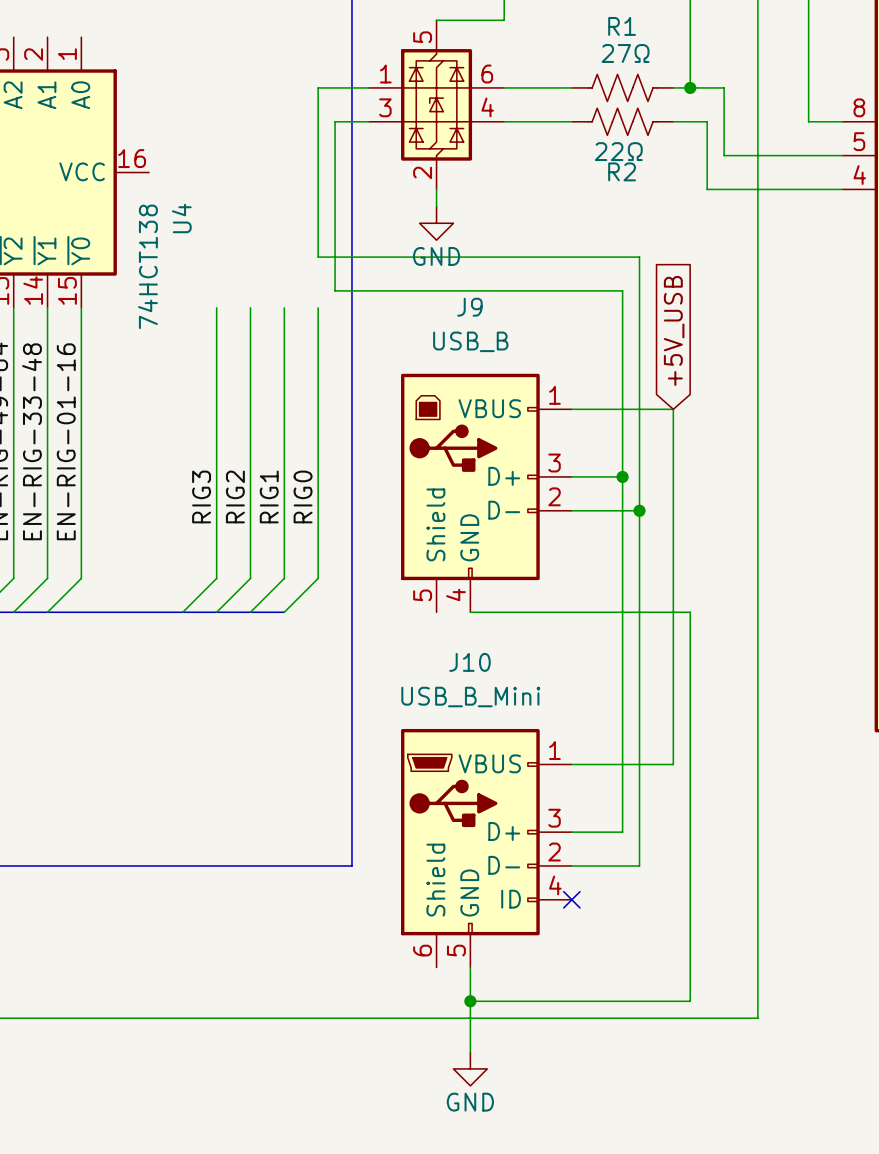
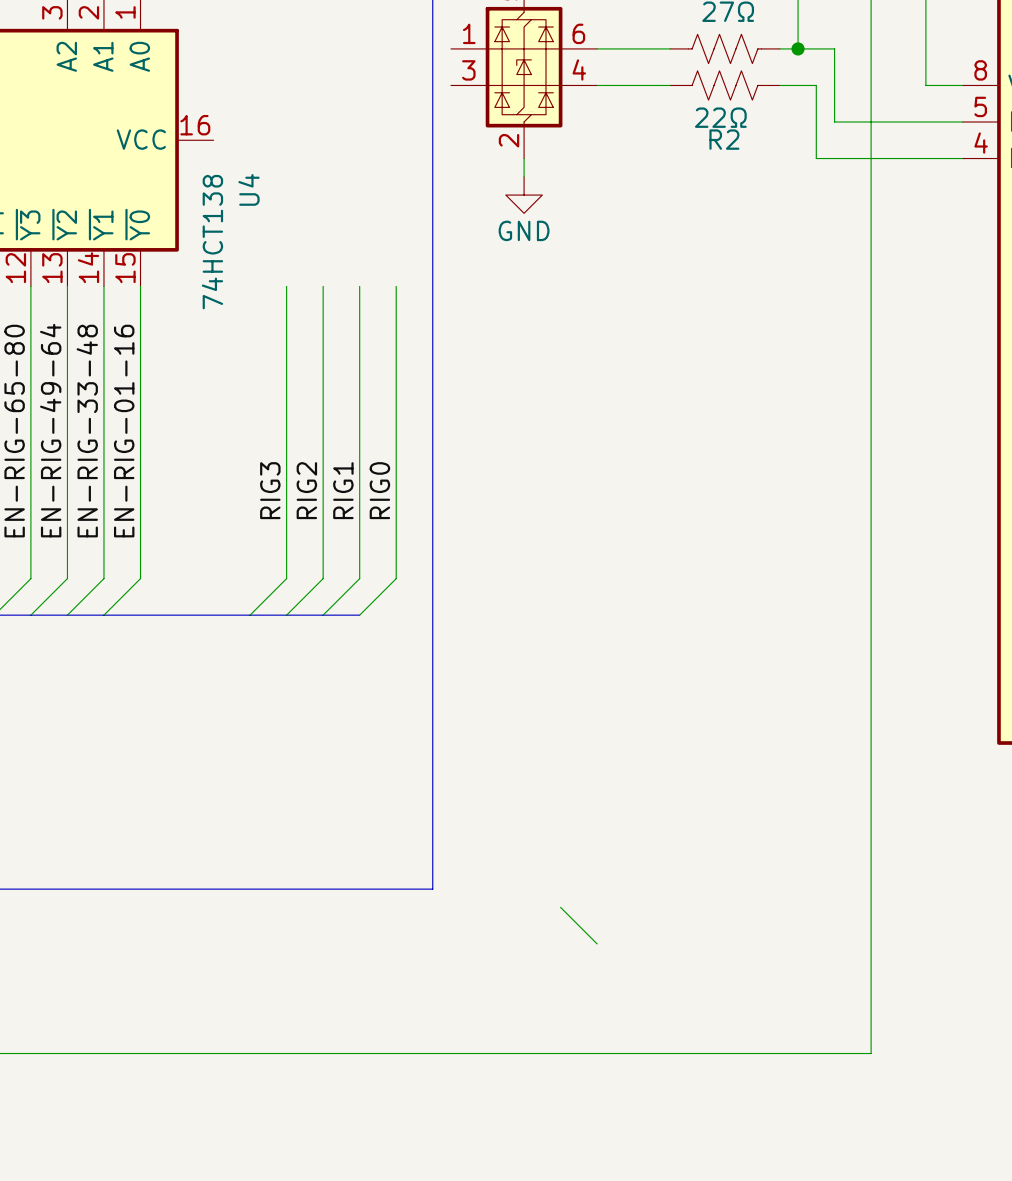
wire: (368, 87) (318, 87) (318, 257) (639, 257) (639, 865) (571, 865) -> none
wire: (368, 121) (335, 121) (335, 290) (622, 290) (622, 832) (571, 832) -> none
global label: +5V_USB (674, 330) -> none
wire: (571, 409) (673, 409) (673, 764) (571, 764) -> none
wire: (571, 476) (622, 476) -> none
junction: (622, 476) -> none
J9: USB_B (486, 493) -> none
wire: (571, 510) (639, 510) -> none
junction: (639, 510) -> none
wire: (470, 612) (690, 612) (690, 1001) (470, 1001) -> none
J10: USB_B_Mini (486, 848) -> none
no-connect mark: (571, 899) -> none
wire: (470, 967) (470, 1052) -> none
junction: (470, 1001) -> none
power symbol: GND (470, 1068) -> none

